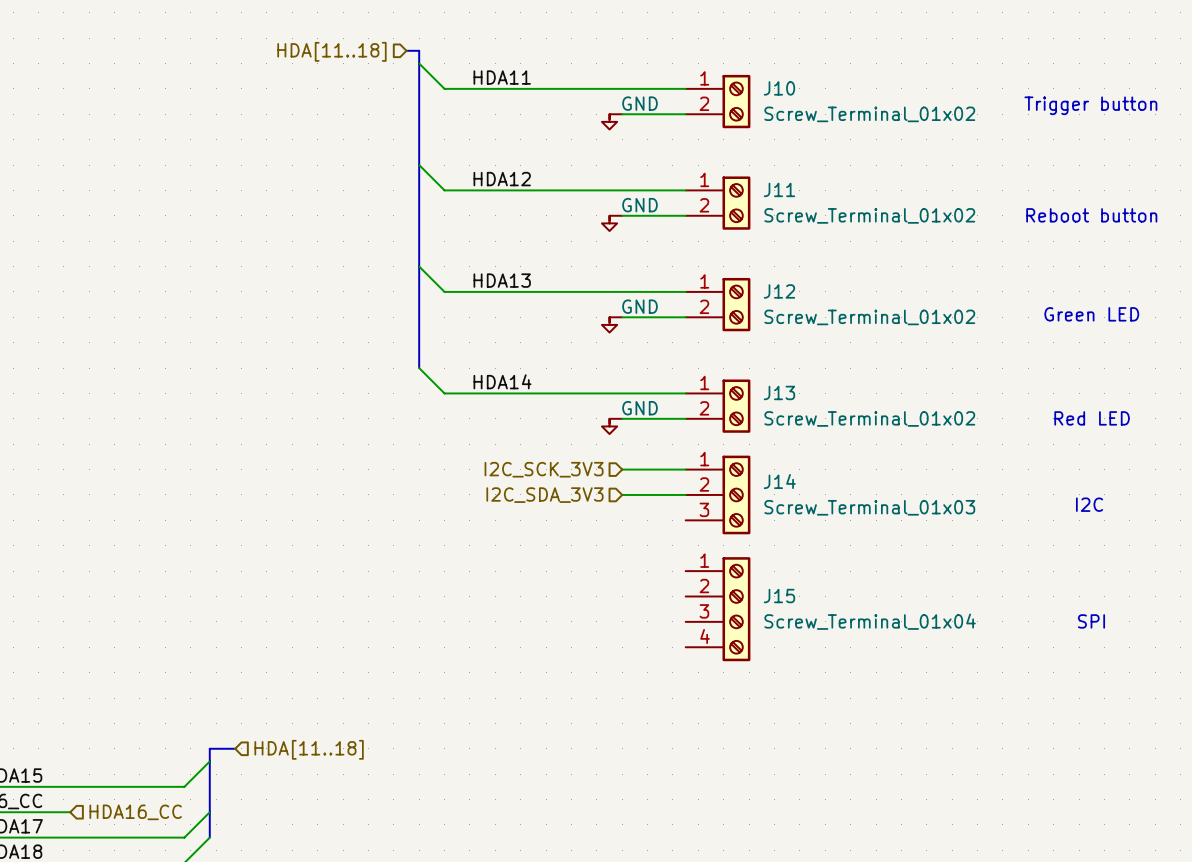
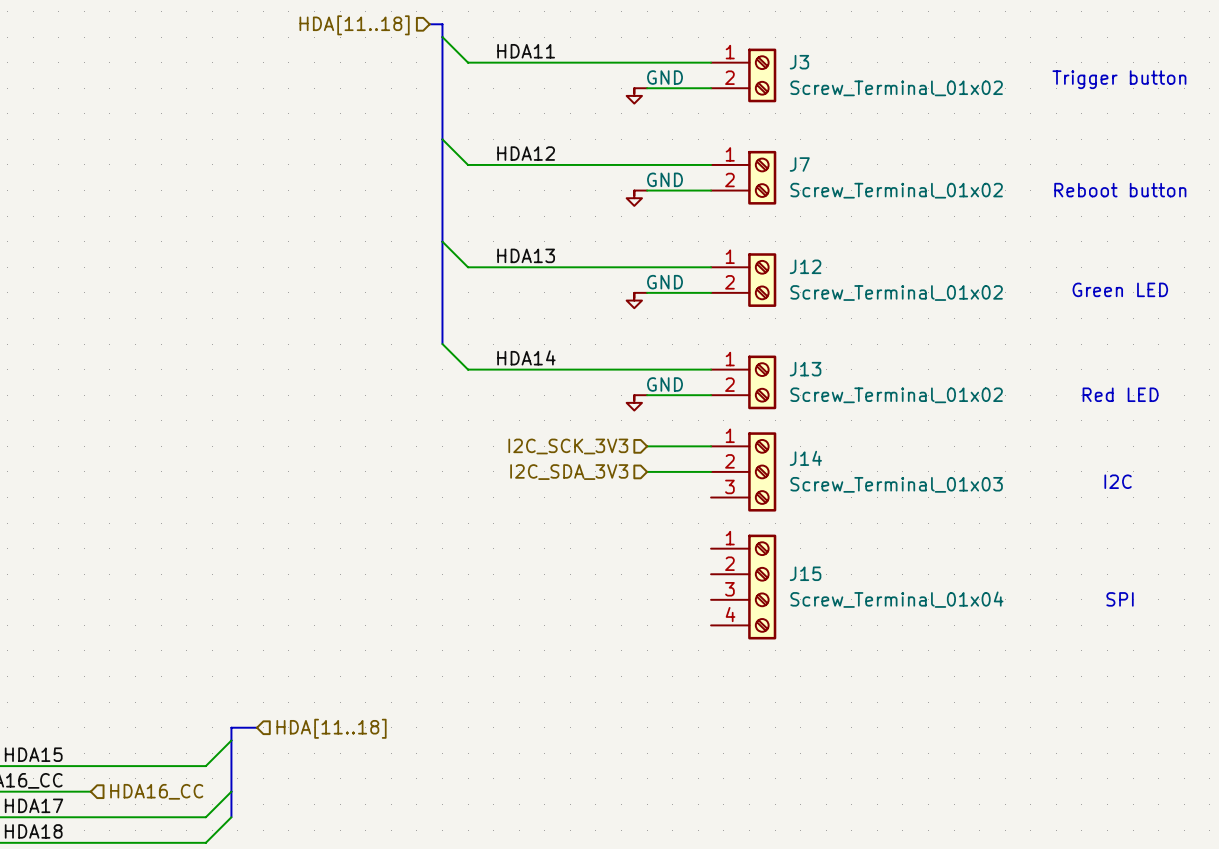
J10 name: J10 (779, 88) -> J3 (799, 62)
J11 name: J11 (779, 189) -> J7 (799, 164)

